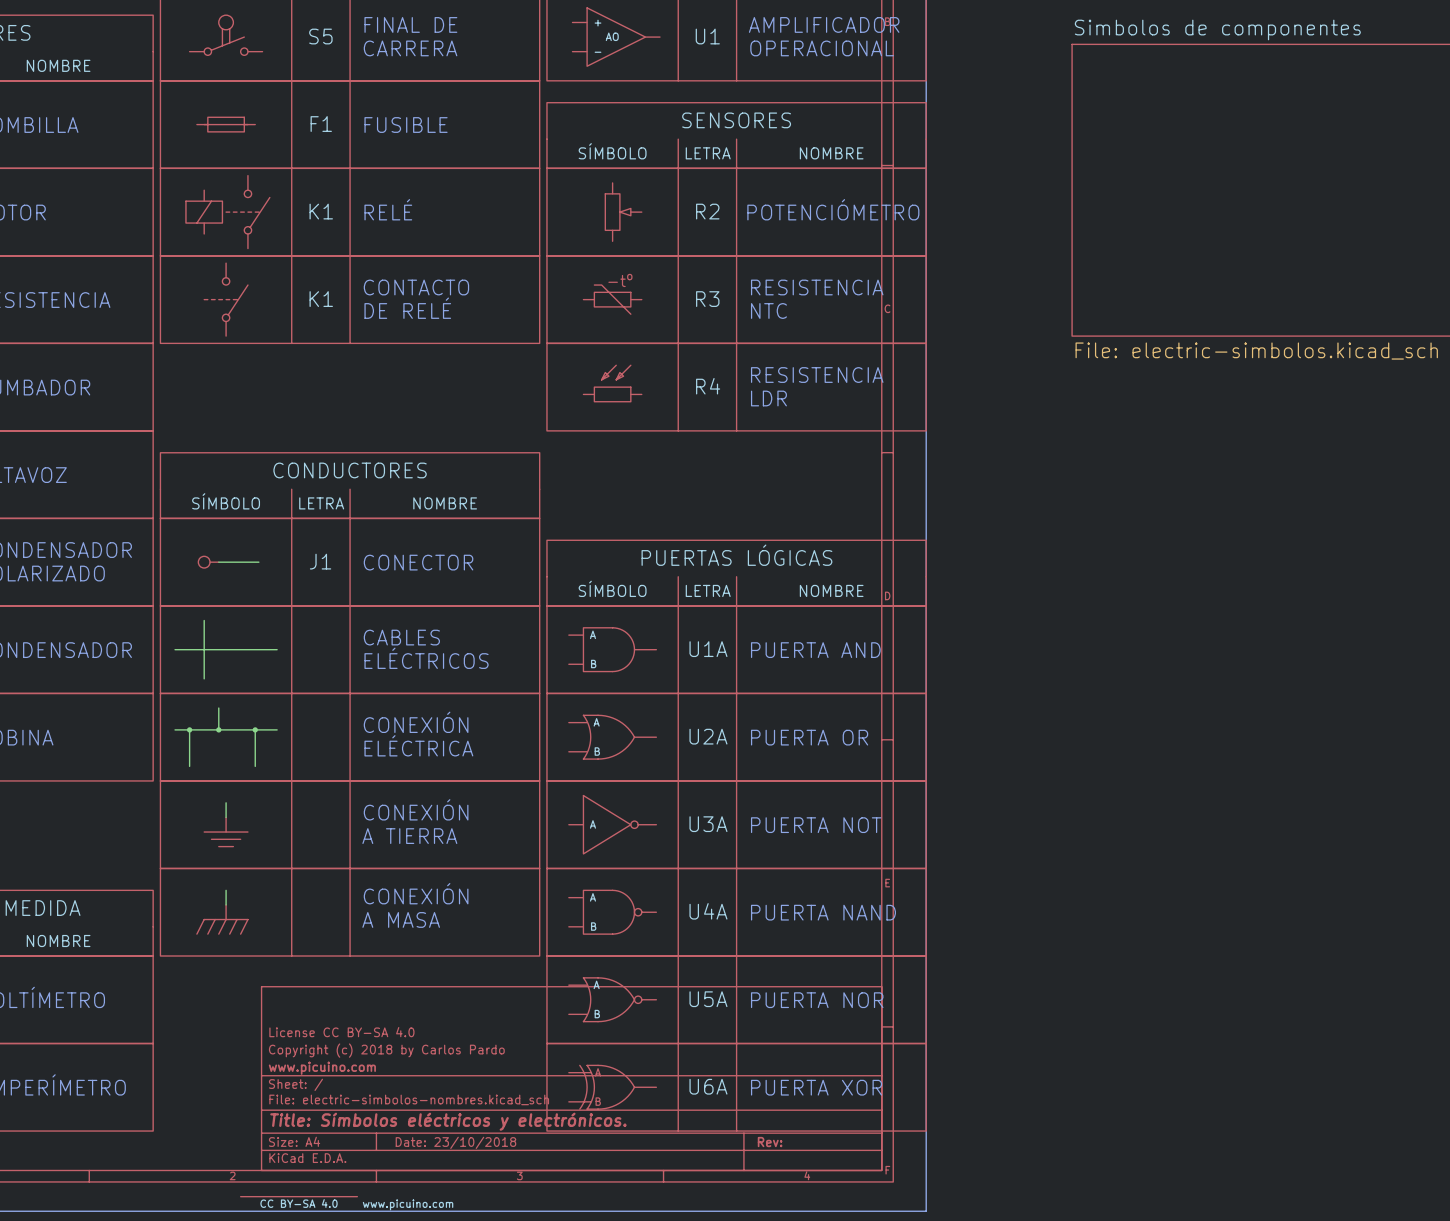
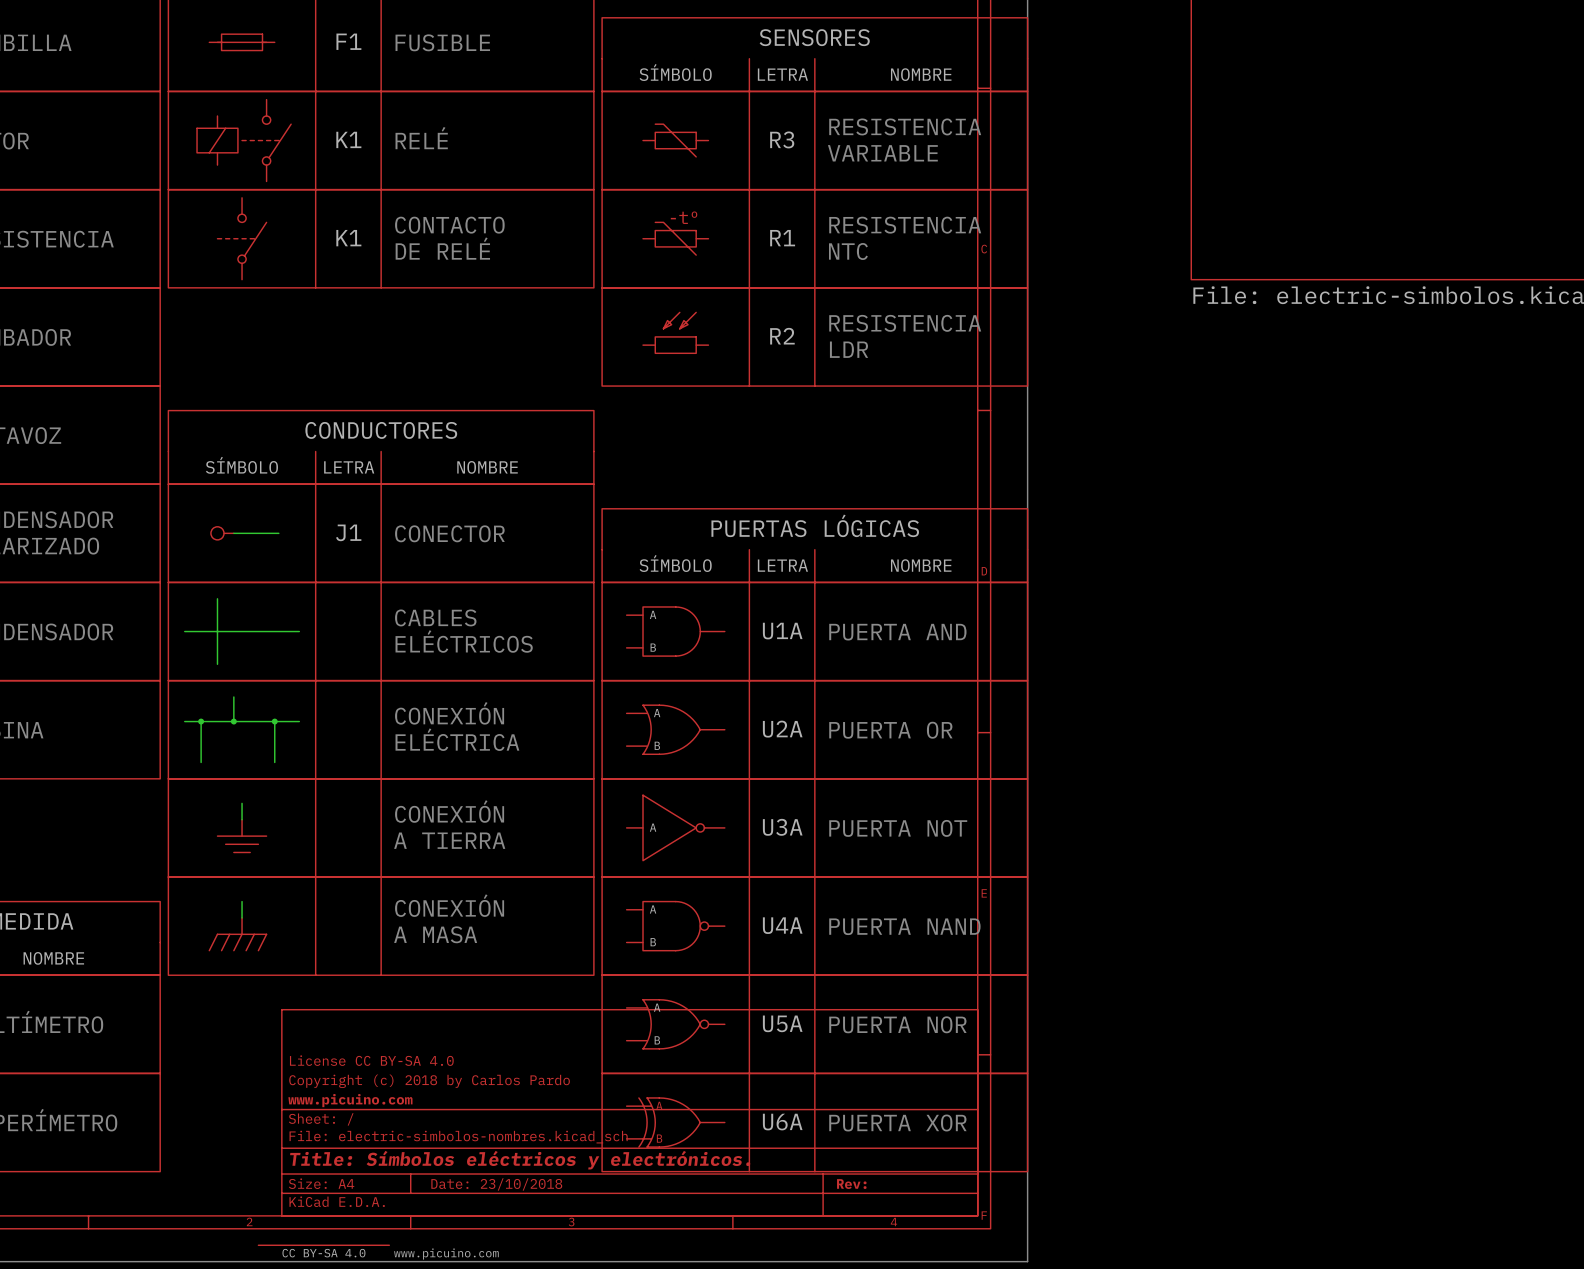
text: none -> RESISTENCIA (905, 126)
text: POTENCIÓMETRO (833, 209) -> none
R3: none -> (675, 140)
R2: (623, 212) -> none
text: none -> VARIABLE (882, 153)
R3 name: R3 (707, 299) -> R1 (782, 238)
R4 name: R4 (708, 386) -> R2 (782, 336)

